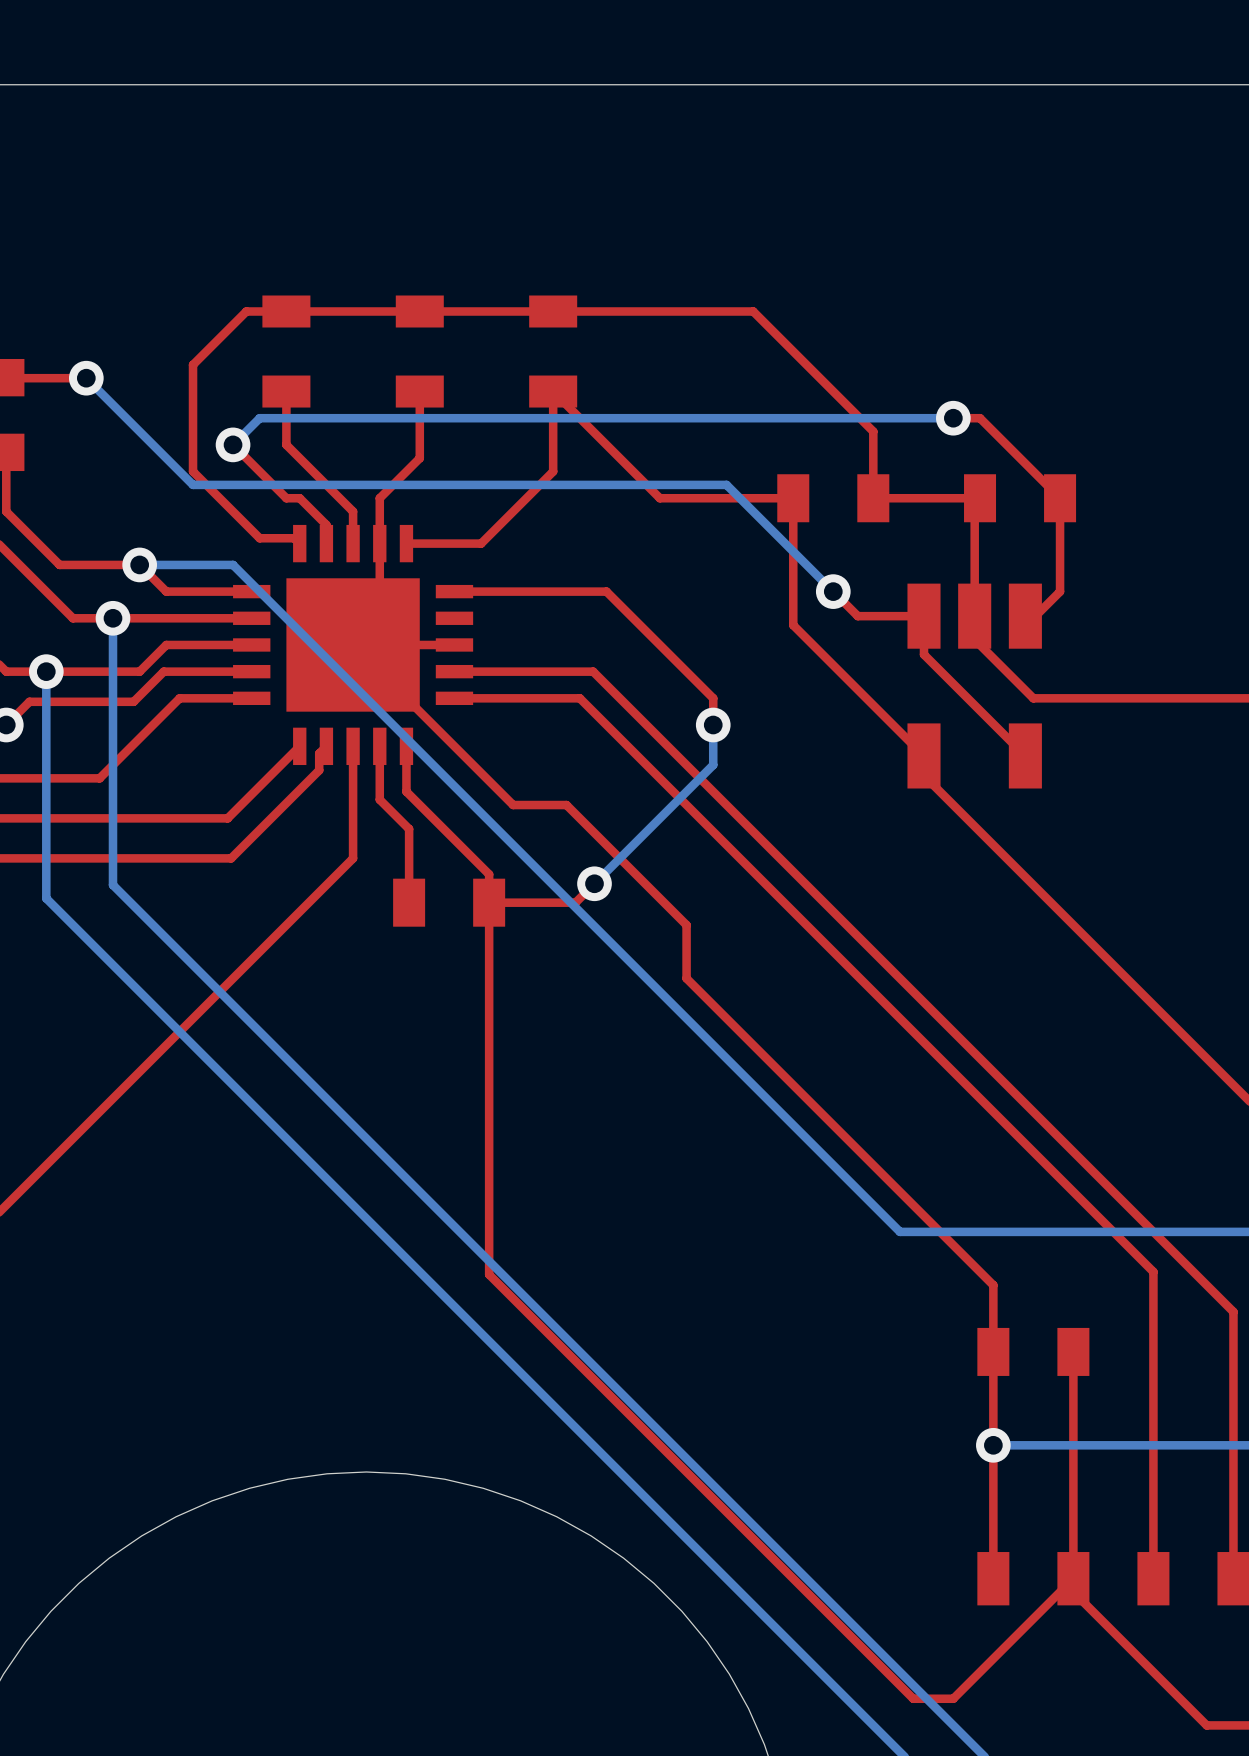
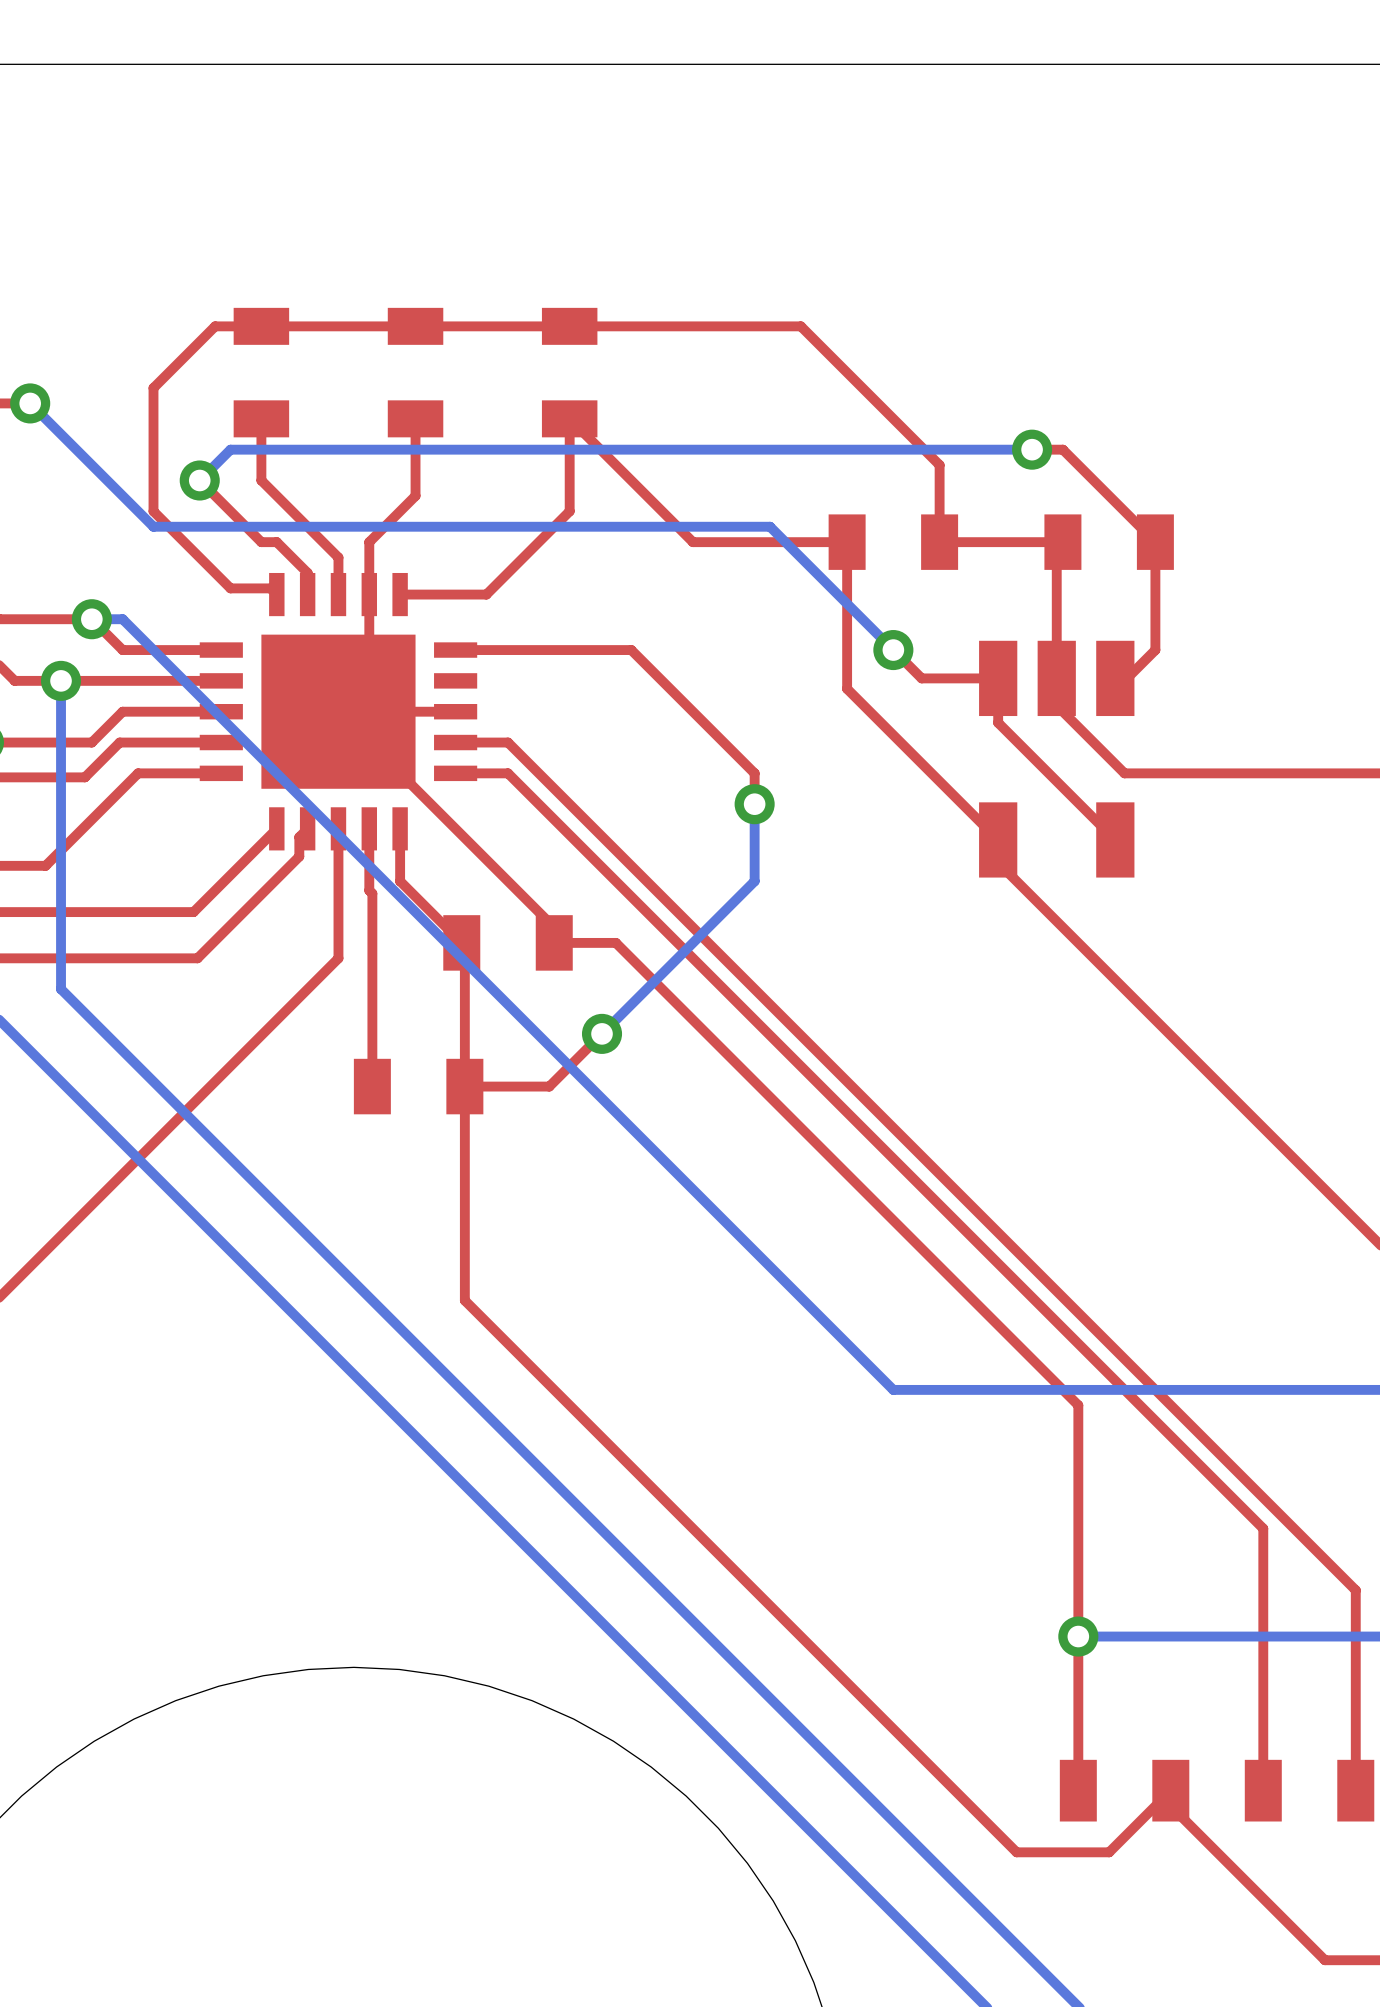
bottom track: (166, 564) (233, 564) (899, 1231) -> (122, 619) (893, 1389) (970, 1389)
top track: (499, 671) (593, 671) (1233, 1311) (1233, 1405) -> (508, 742) (1355, 1590)
top track: (499, 698) (579, 698) (1153, 1271) (1153, 1351) -> (508, 773) (1263, 1528)
bottom track: (713, 765) (594, 883) -> (754, 850) (754, 881) (602, 1033)
top track: (382, 802) (409, 829) (409, 902) -> (372, 893) (372, 1086)
top track: (513, 805) (566, 805) (686, 925) (686, 978) (993, 1285) -> (523, 896) (554, 927) (554, 942) (615, 942) (1078, 1405) (1078, 1451)
part: none -> (508, 942)
top track: (462, 847) (489, 874) (489, 1274) (913, 1698) (953, 1698) (1020, 1632) -> (464, 945) (464, 1300) (1016, 1852) (1109, 1852)
top track: (594, 883) (575, 902) (489, 902) -> none
via position: (594, 883) -> (602, 1033)
part: (449, 902) -> none
top track: none -> (602, 1033) (549, 1086) (464, 1086)
part: none -> (418, 1086)
part: (1033, 1351) -> none
top track: (1073, 1351) (1073, 1578) -> none

